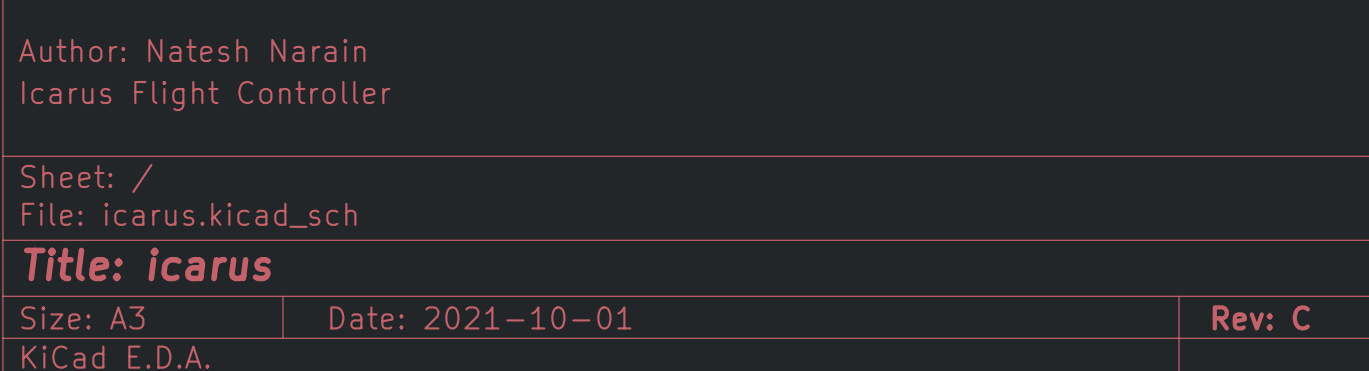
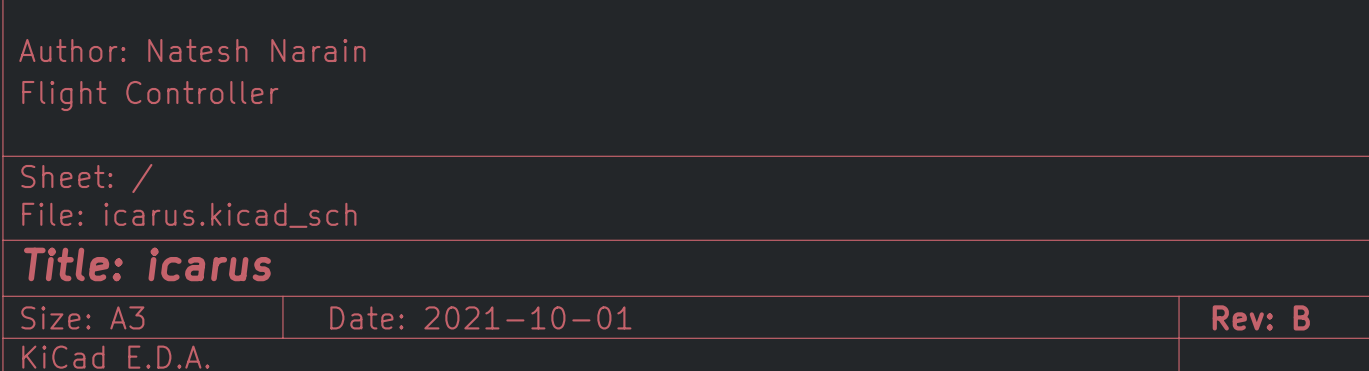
title block: Icarus Flight Controller (206, 96) -> Flight Controller (150, 96)
title block: Rev: C (1261, 317) -> Rev: B (1261, 317)

